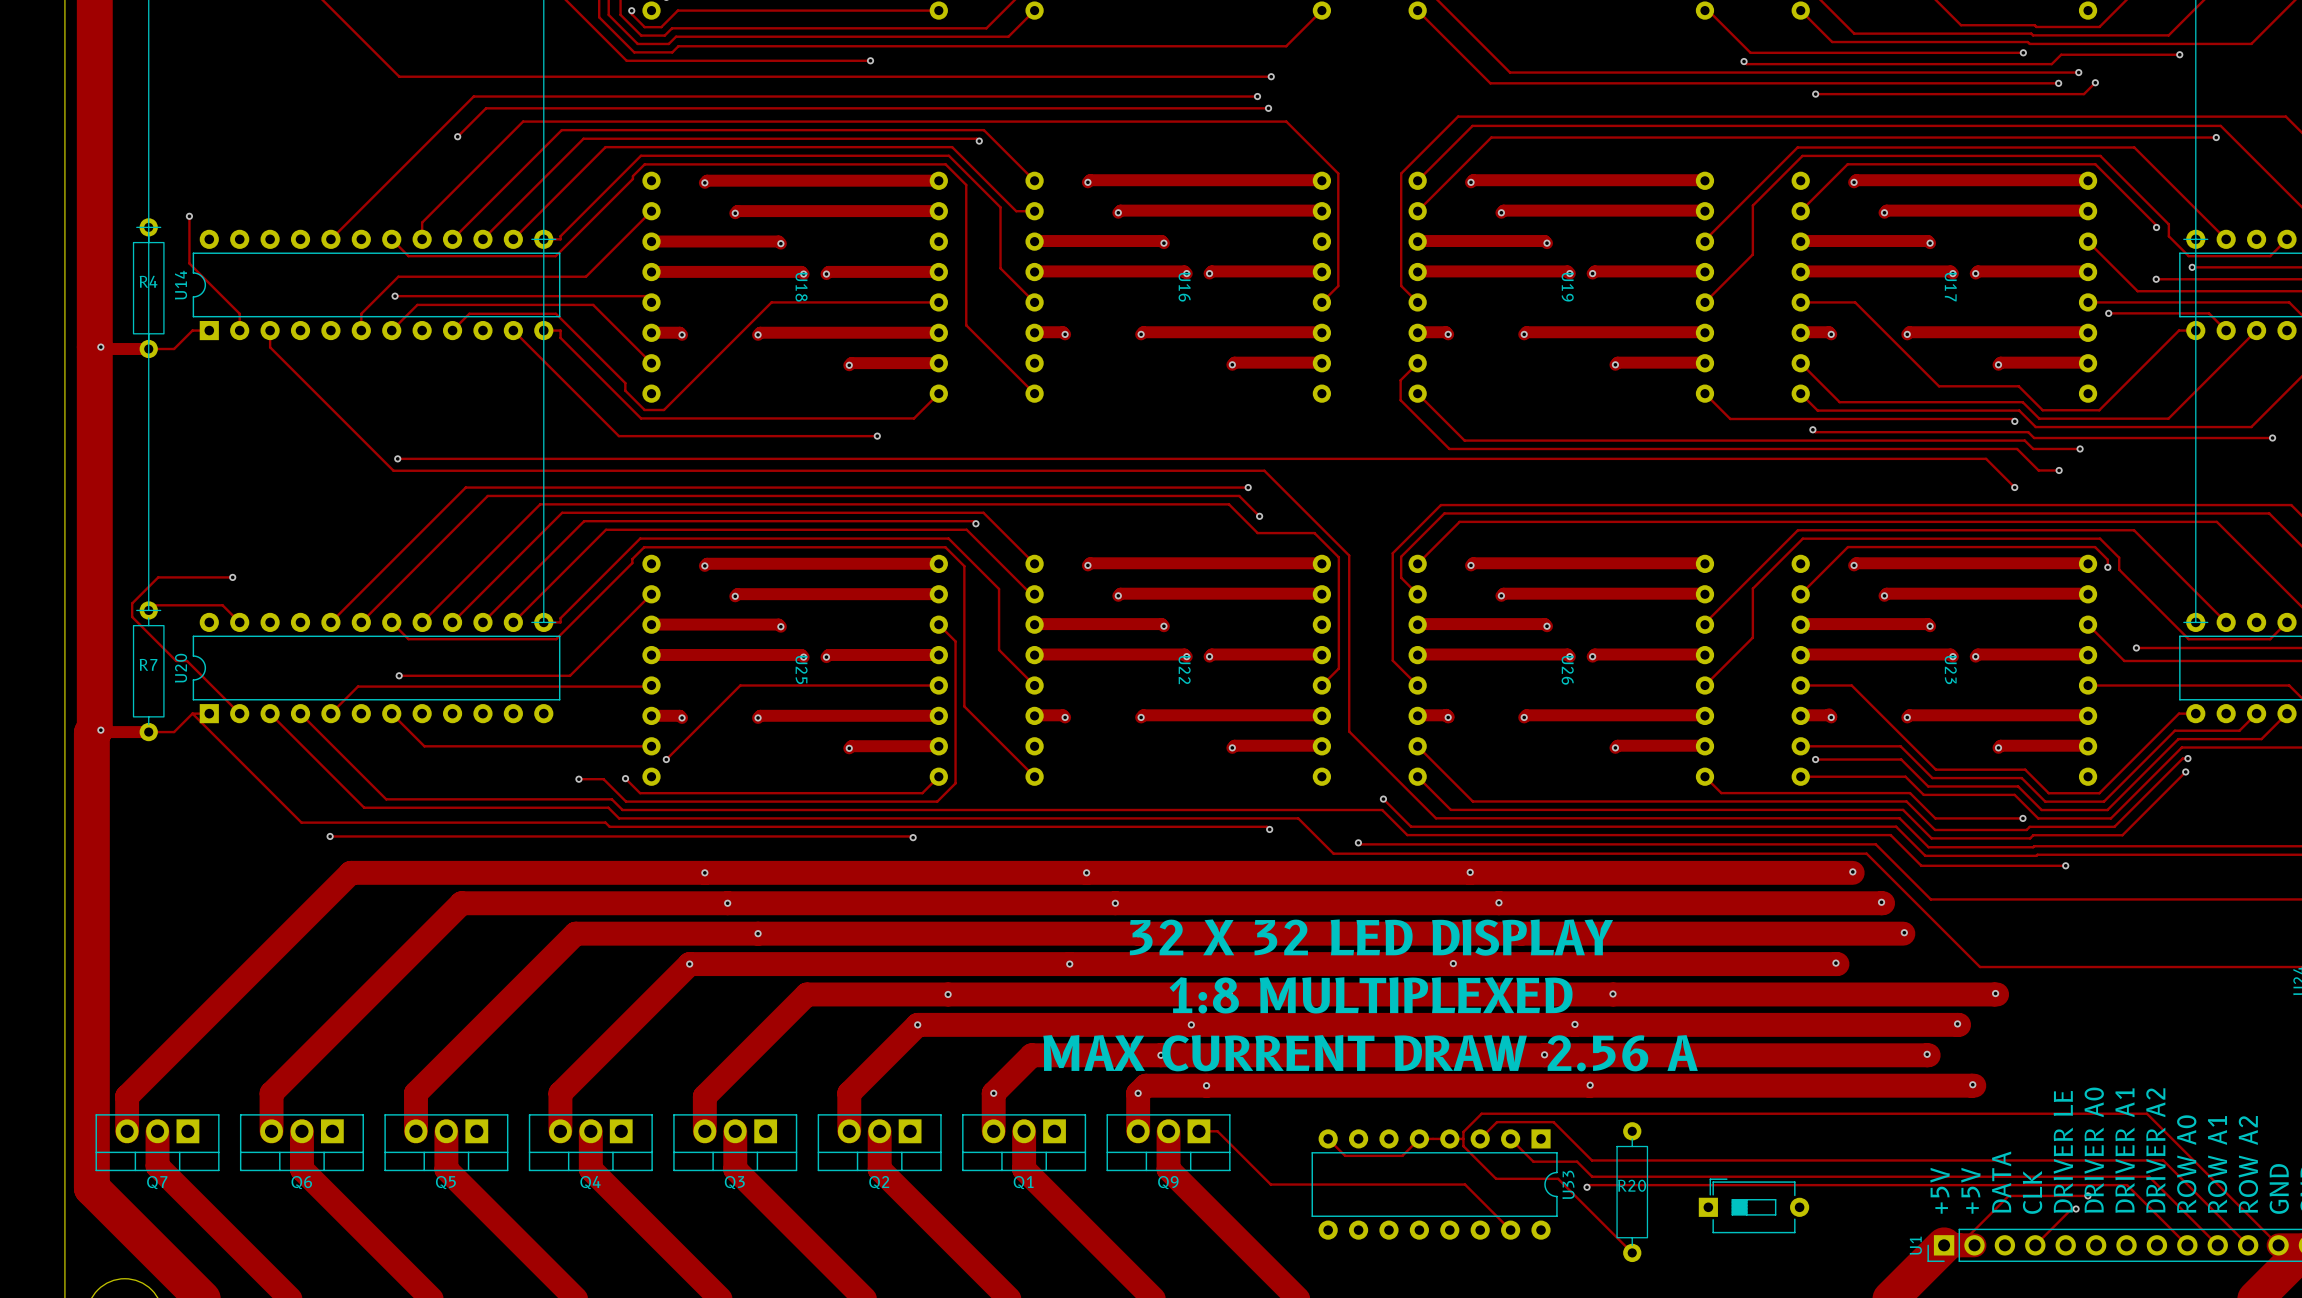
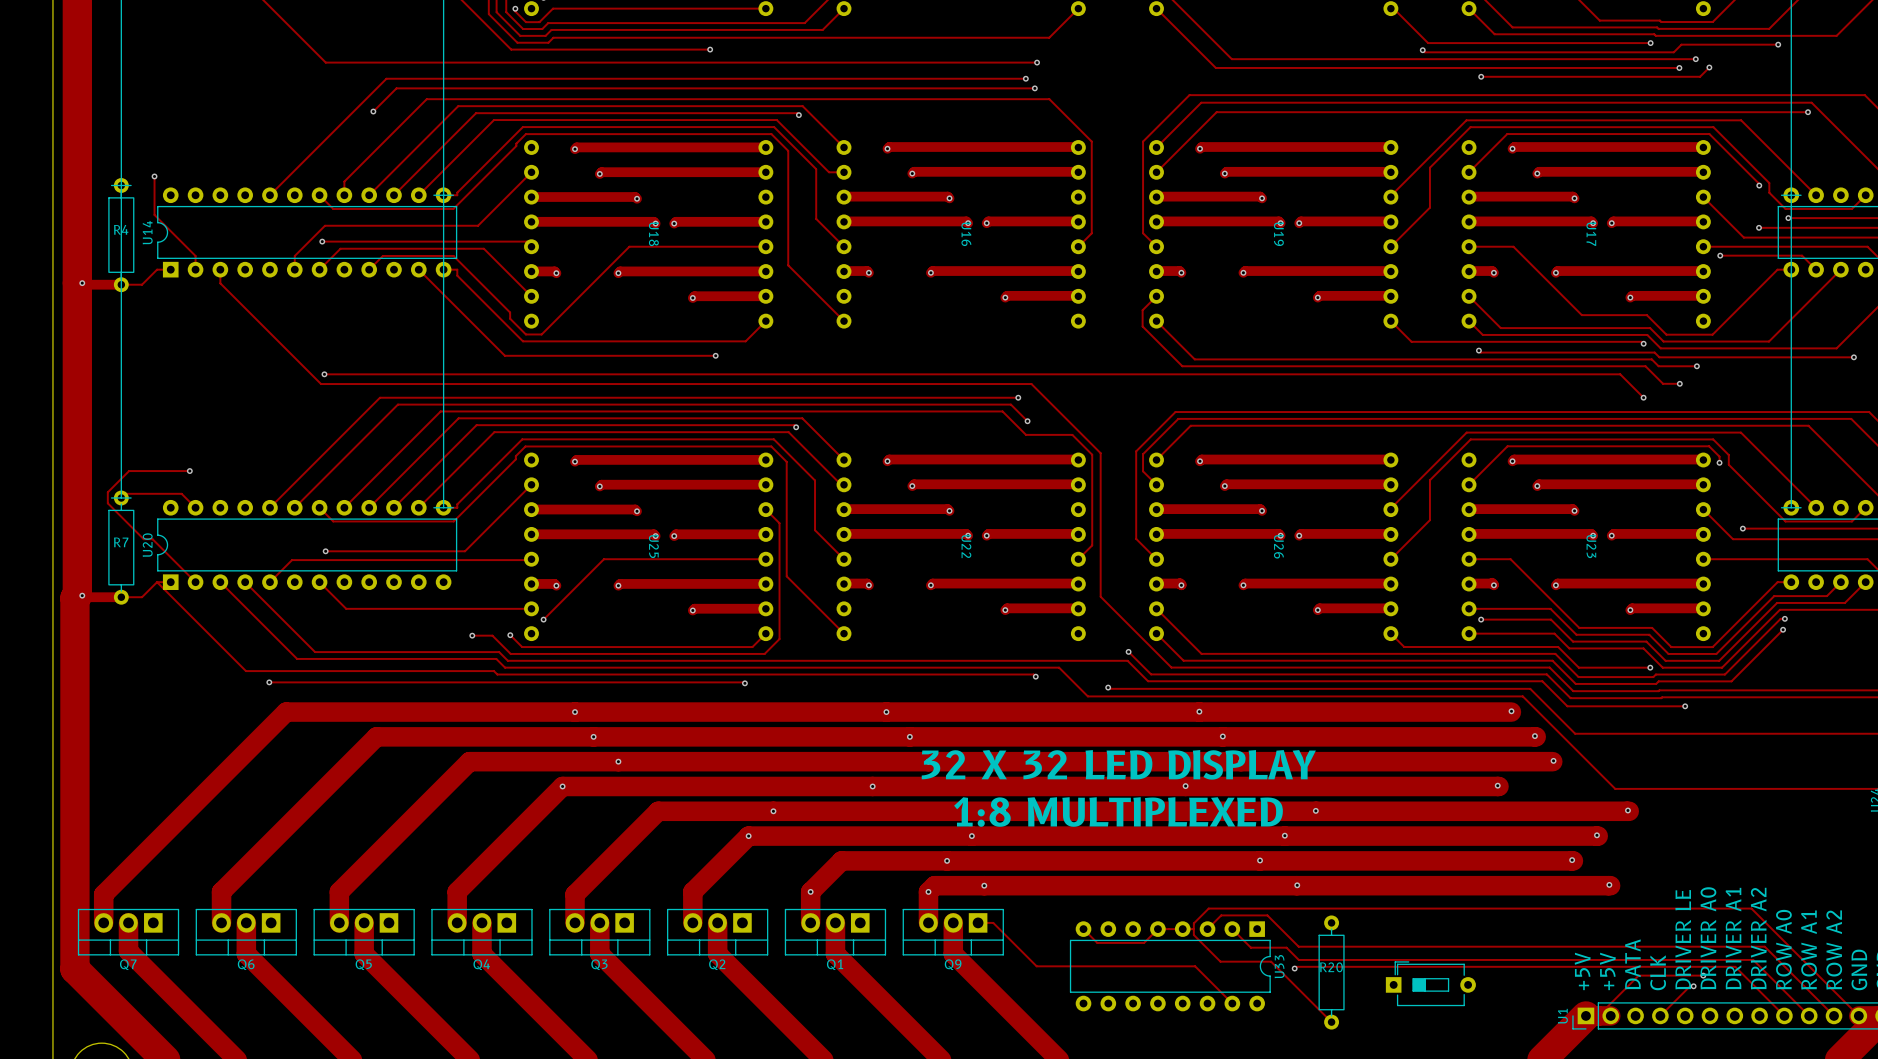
text: MAX CURRENT DRAW 2.56 A (1370, 1053) -> none

